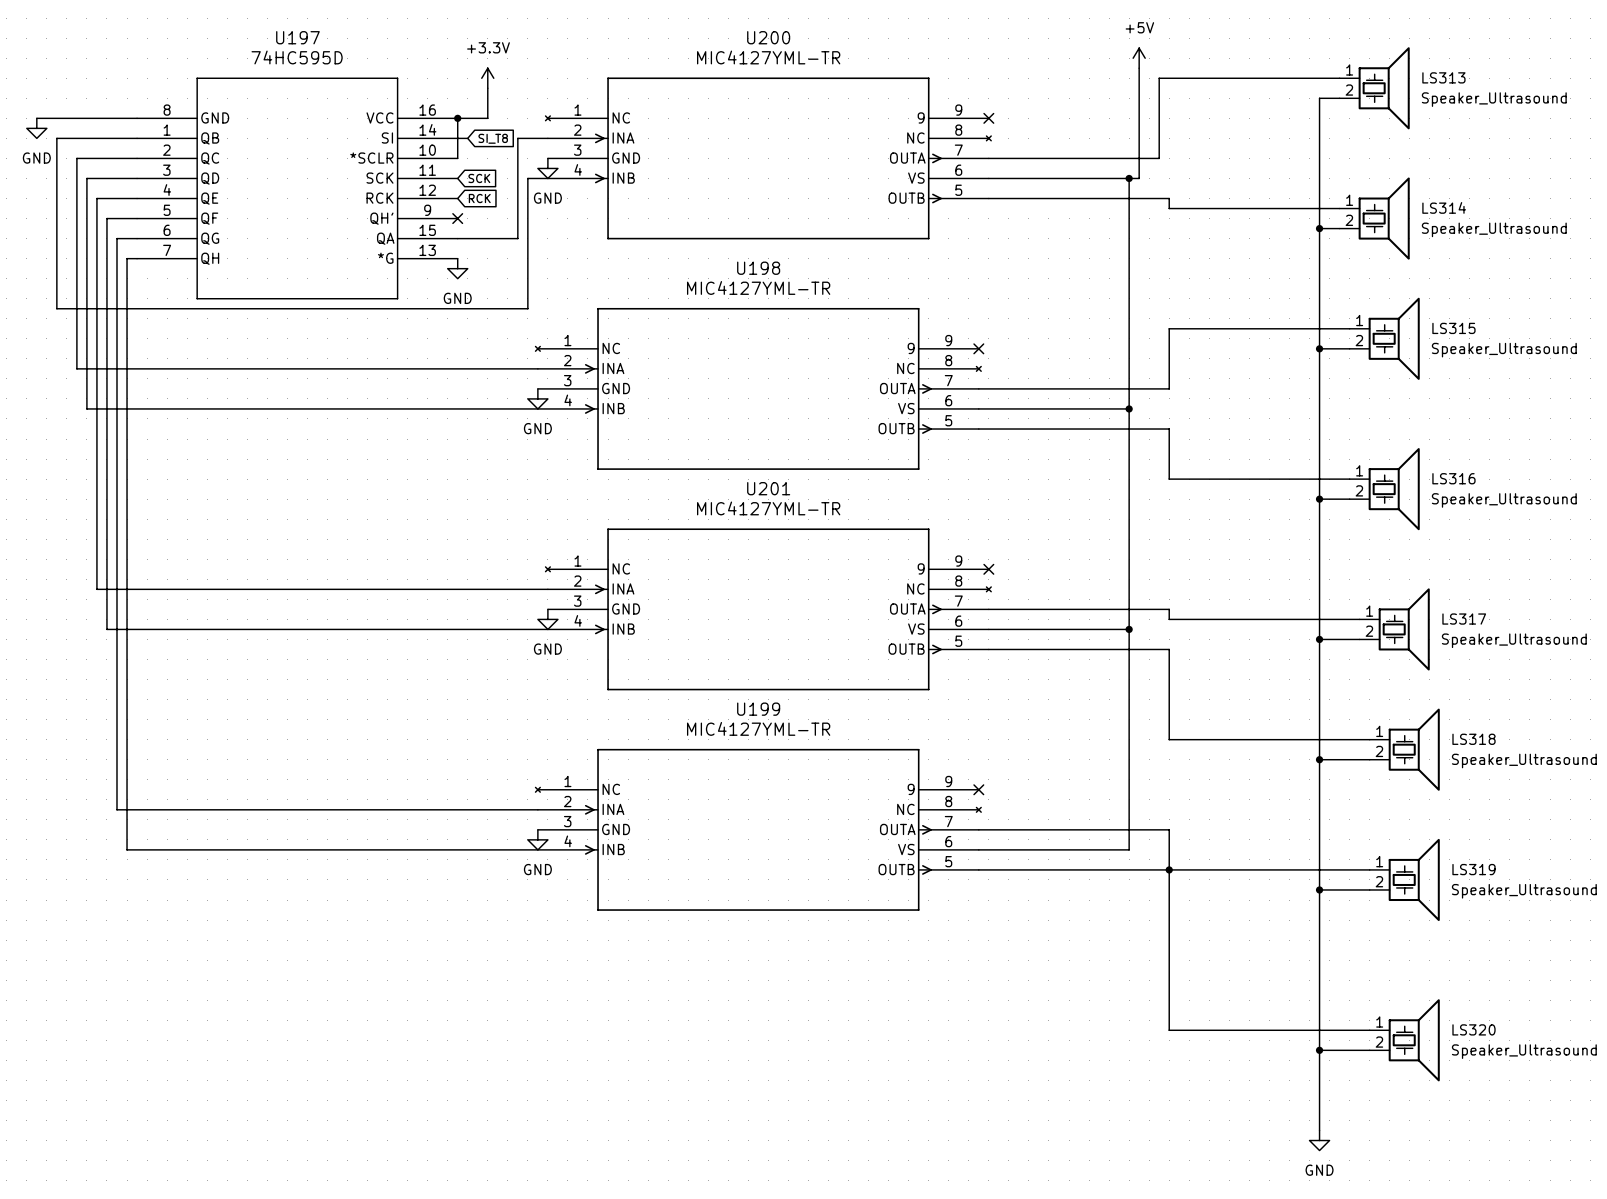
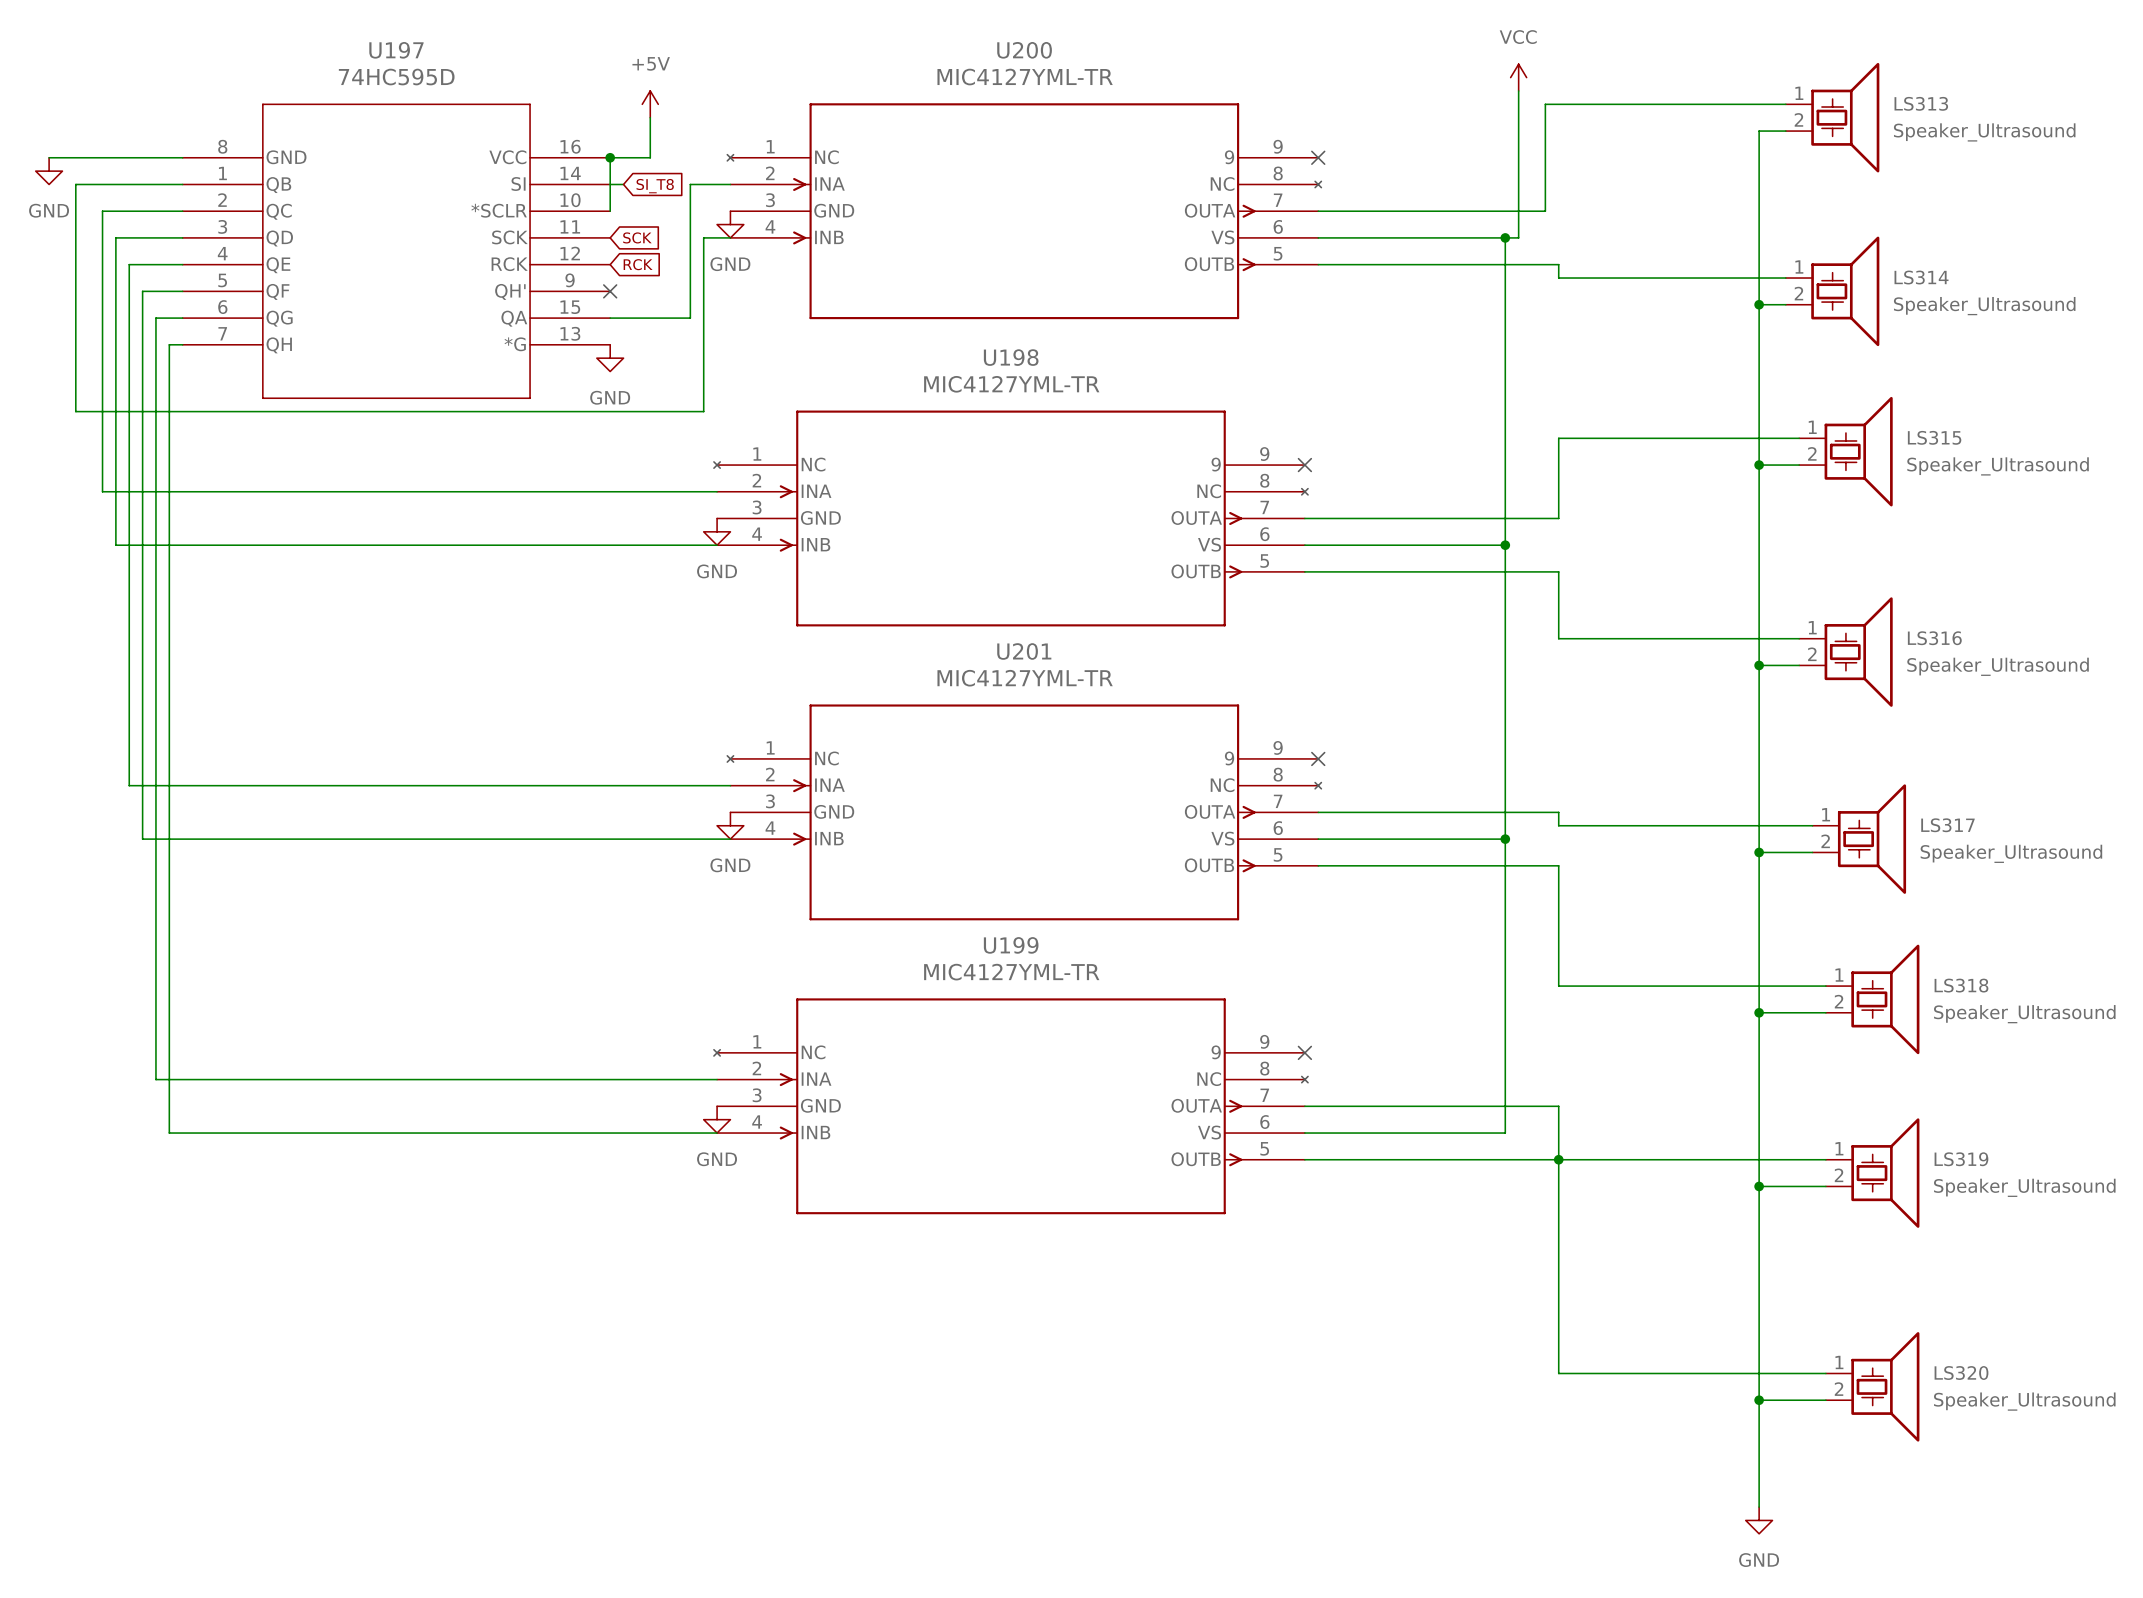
power symbol: +5V (1139, 58) -> VCC (1518, 77)
power symbol: +3.3V (487, 78) -> +5V (650, 104)

